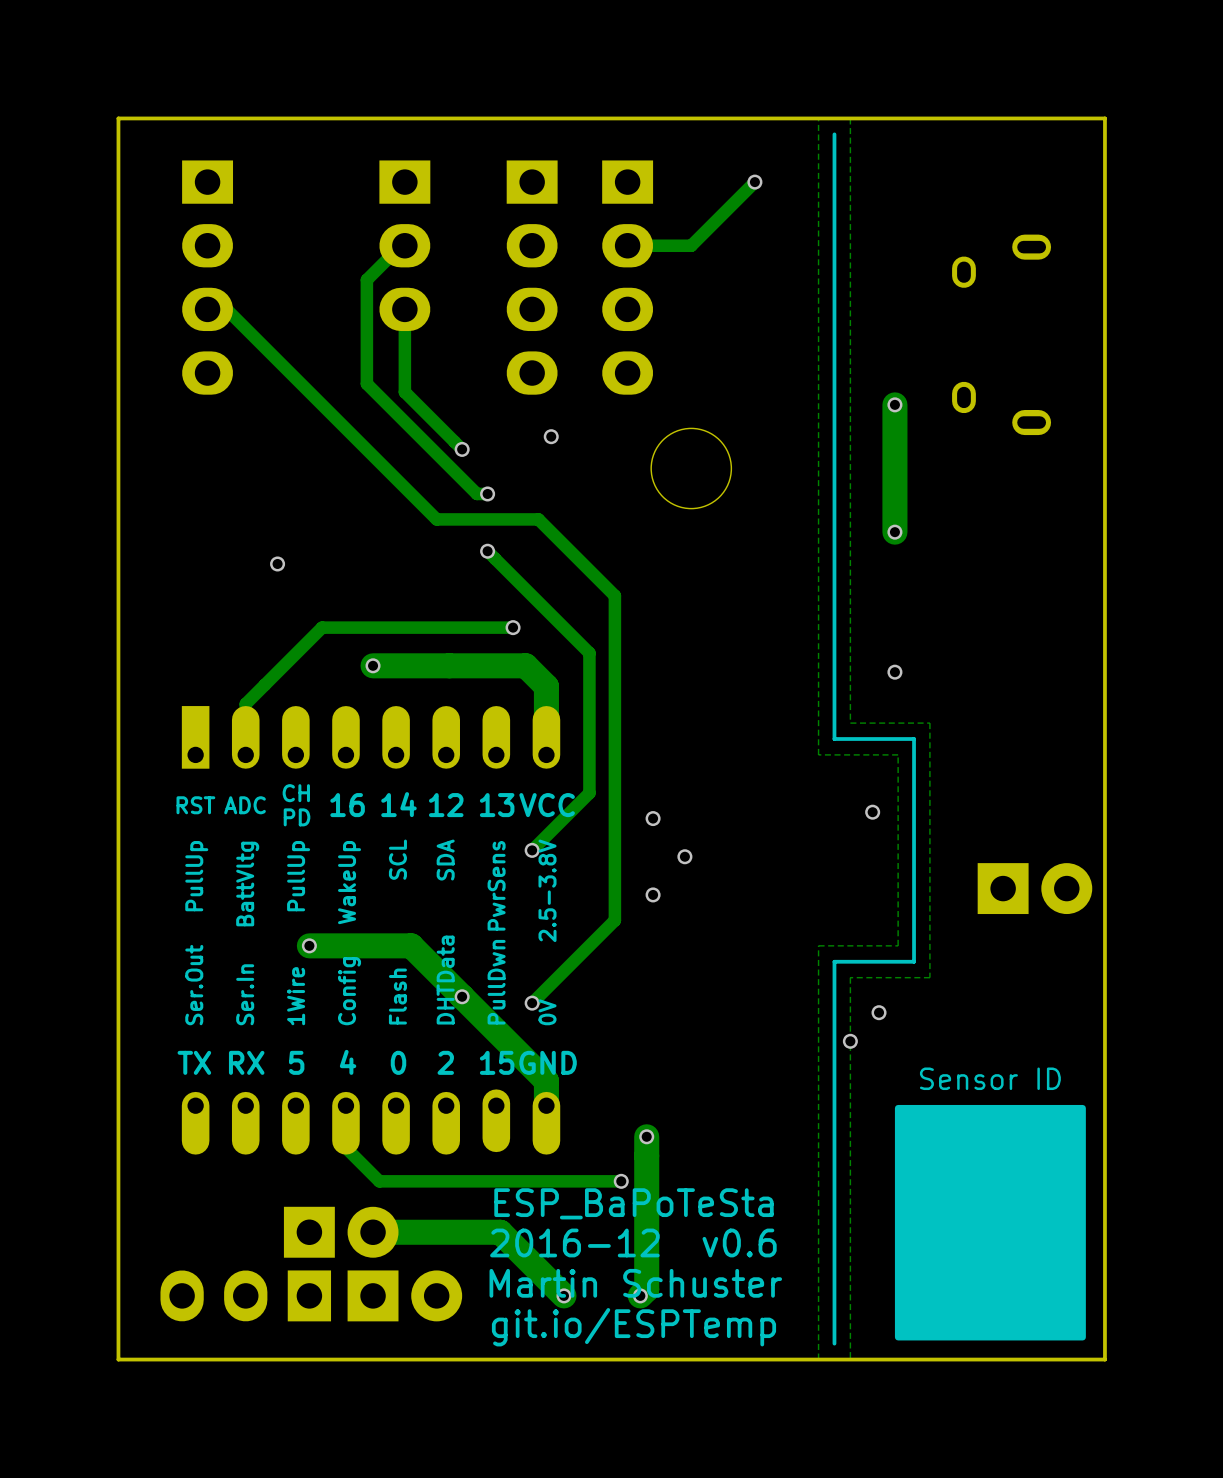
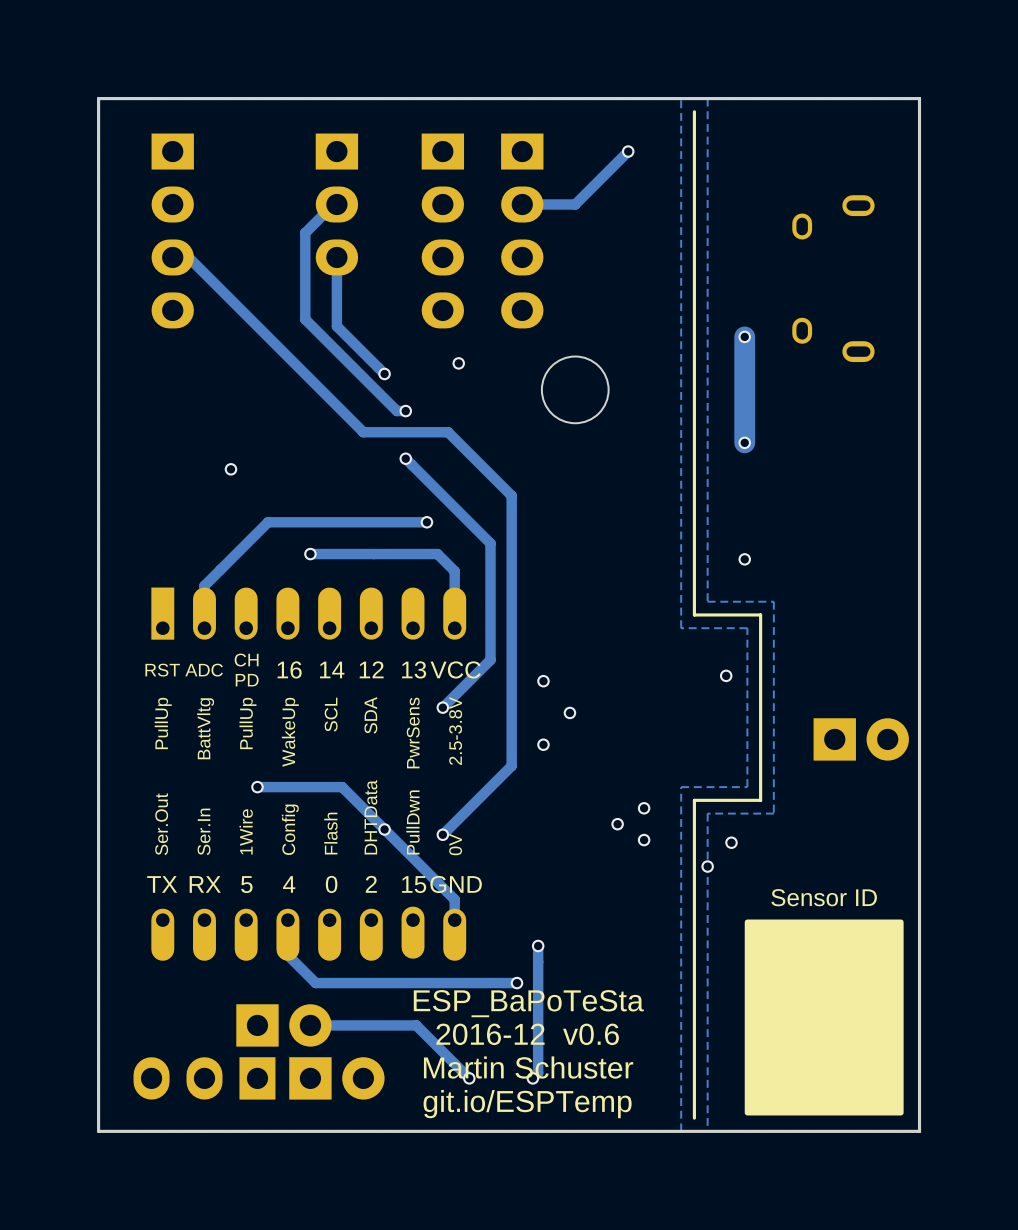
track width: thick (373, 665) (525, 665) (546, 686) (546, 754) -> thin (310, 554) (437, 554) (454, 571) (454, 628)
track width: thick (309, 945) (411, 945) (546, 1081) (546, 1105) -> thin (257, 787) (342, 787) (454, 899) (454, 920)
via: none -> (644, 808)
via: none -> (617, 824)
via: none -> (644, 840)
track width: thick (646, 1136) (646, 1289) (640, 1295) -> thin (538, 945) (538, 1073) (532, 1078)
track width: thick (373, 1232) (500, 1232) (563, 1295) -> thin (310, 1025) (416, 1025) (469, 1078)

